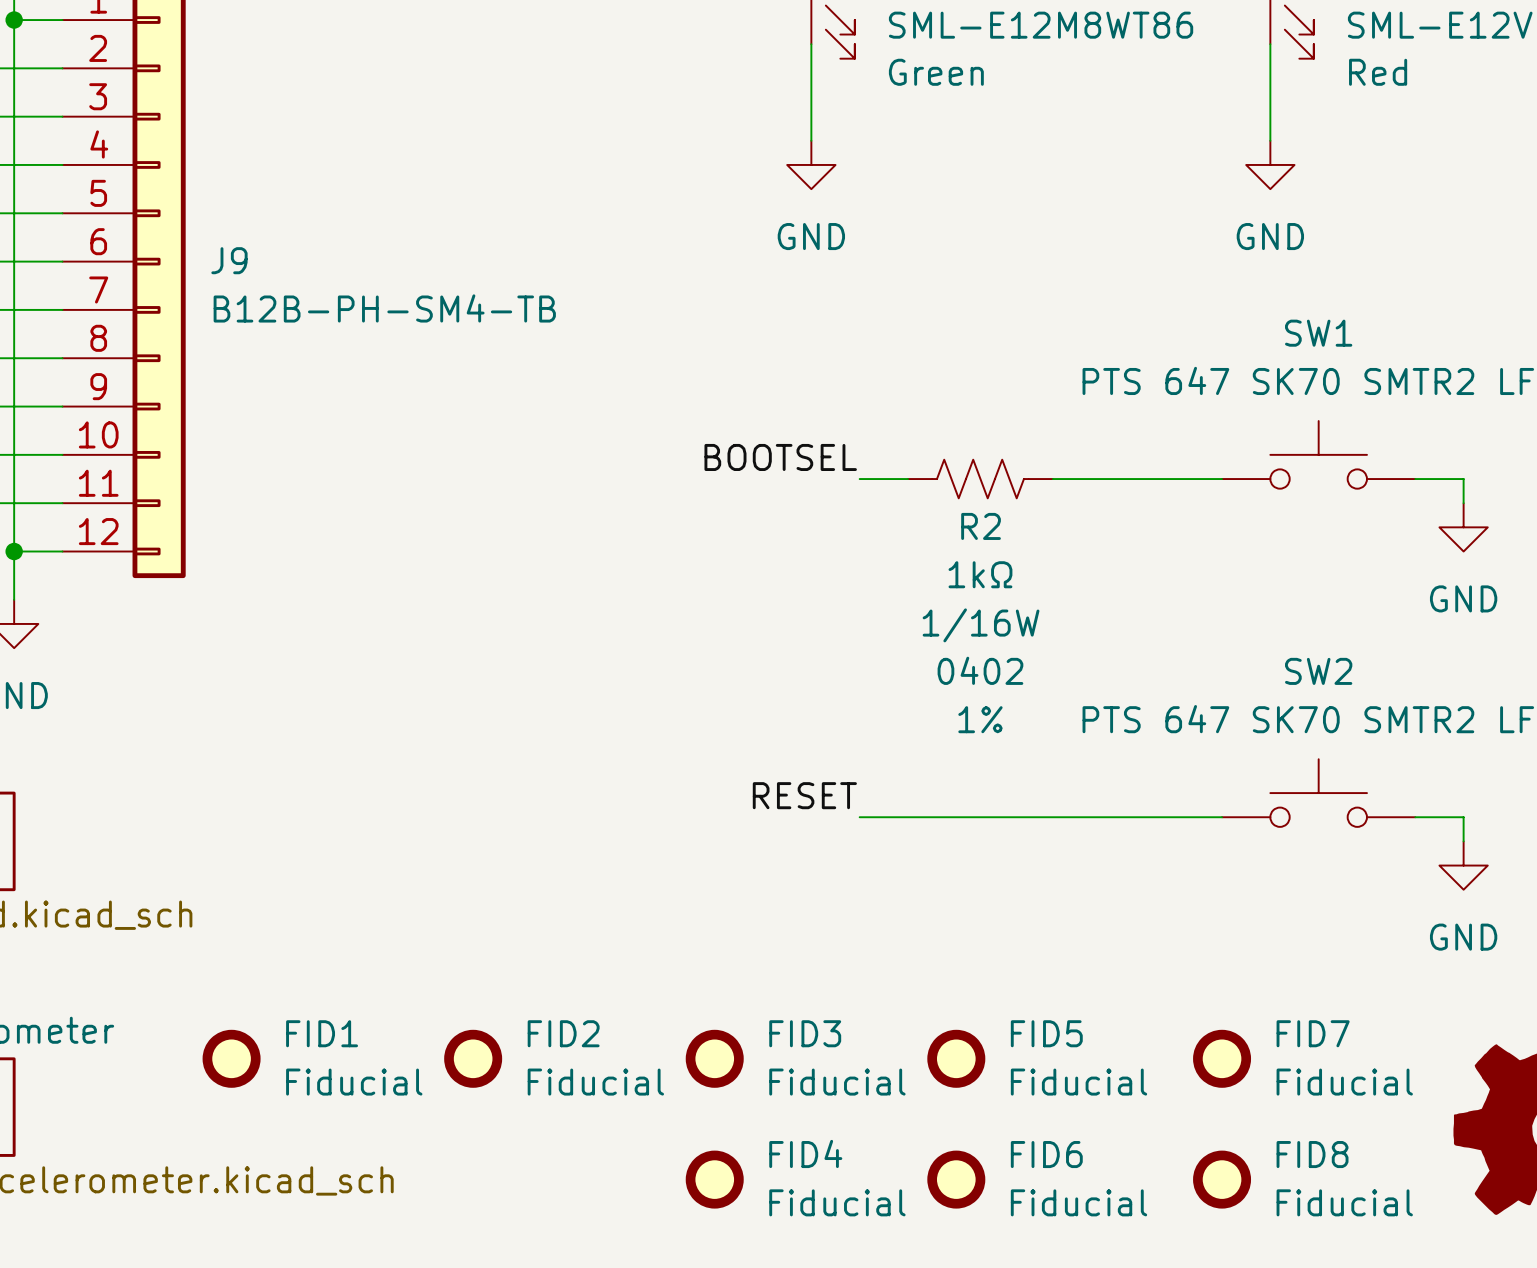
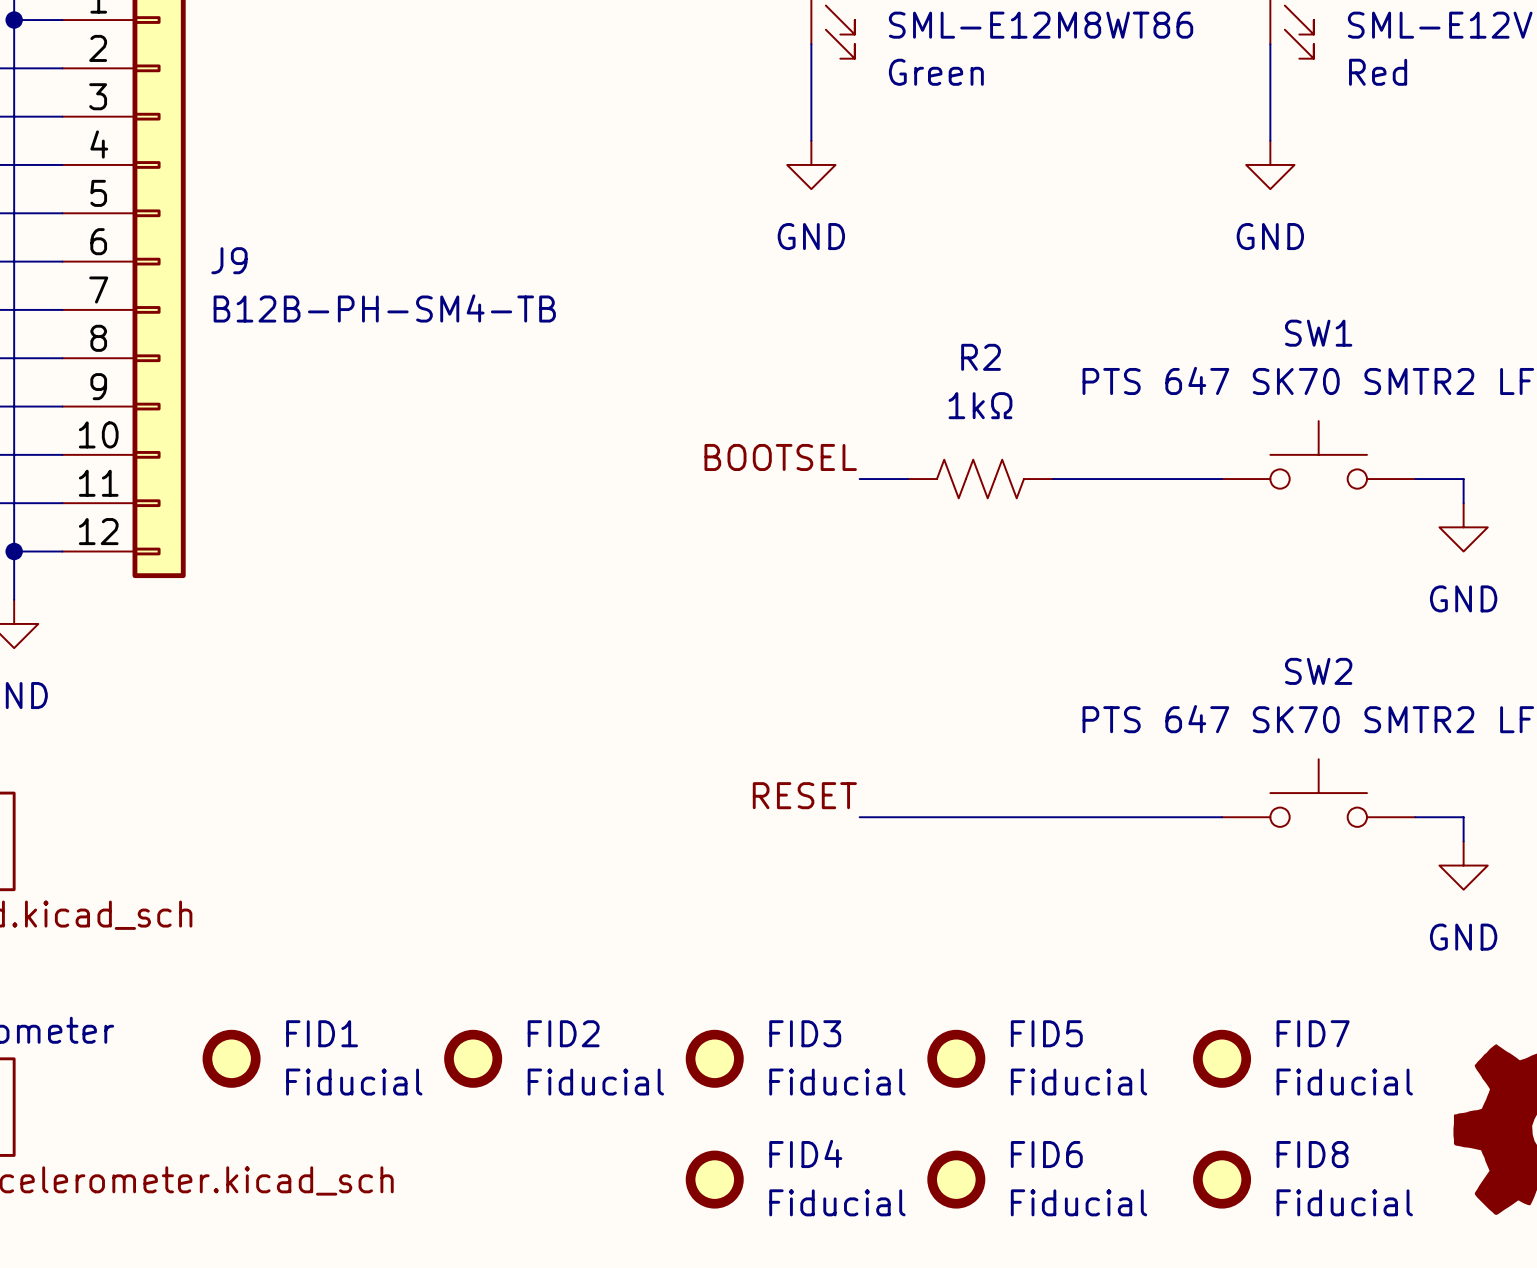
R2 name position: R2 (981, 526) -> R2 (981, 357)
R2 value position: 1kΩ (980, 574) -> 1kΩ (980, 405)
R2 text: 1/16W (981, 625) -> none
R2 text: 0402 (980, 670) -> none
R2 text: 1% (980, 719) -> none

